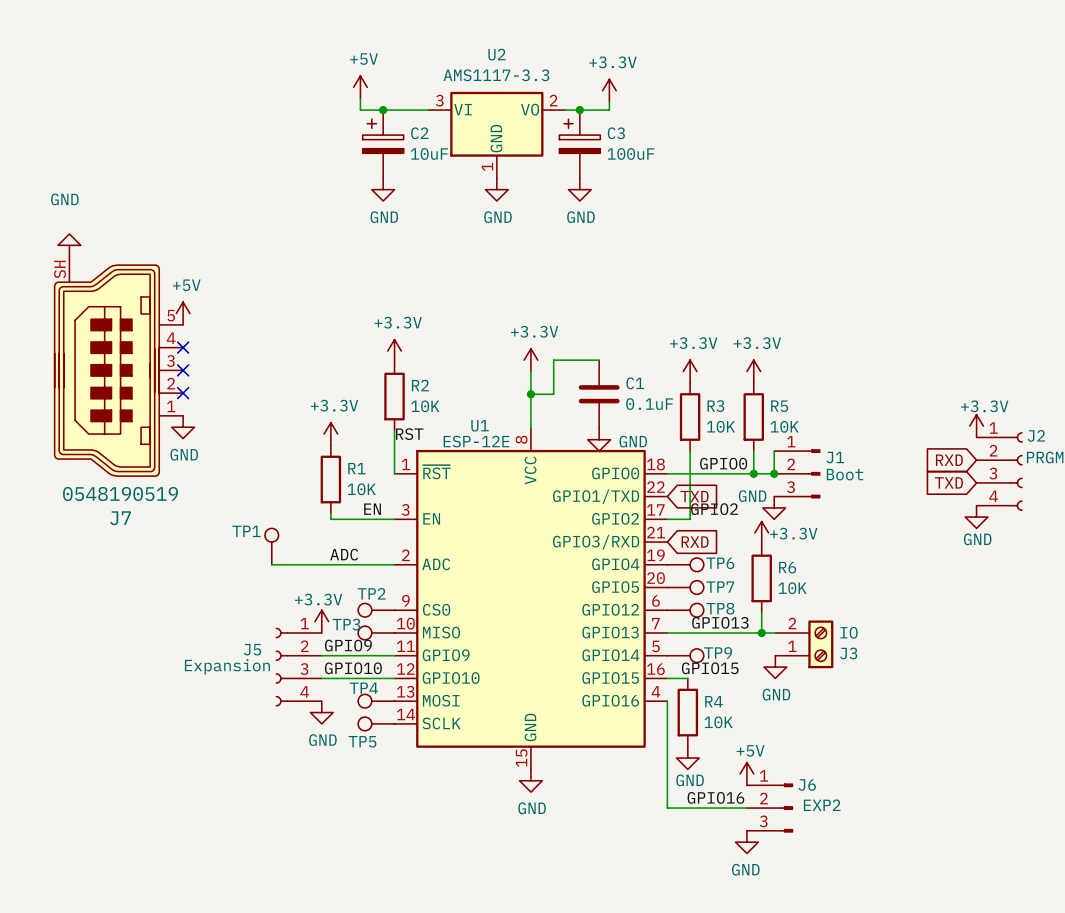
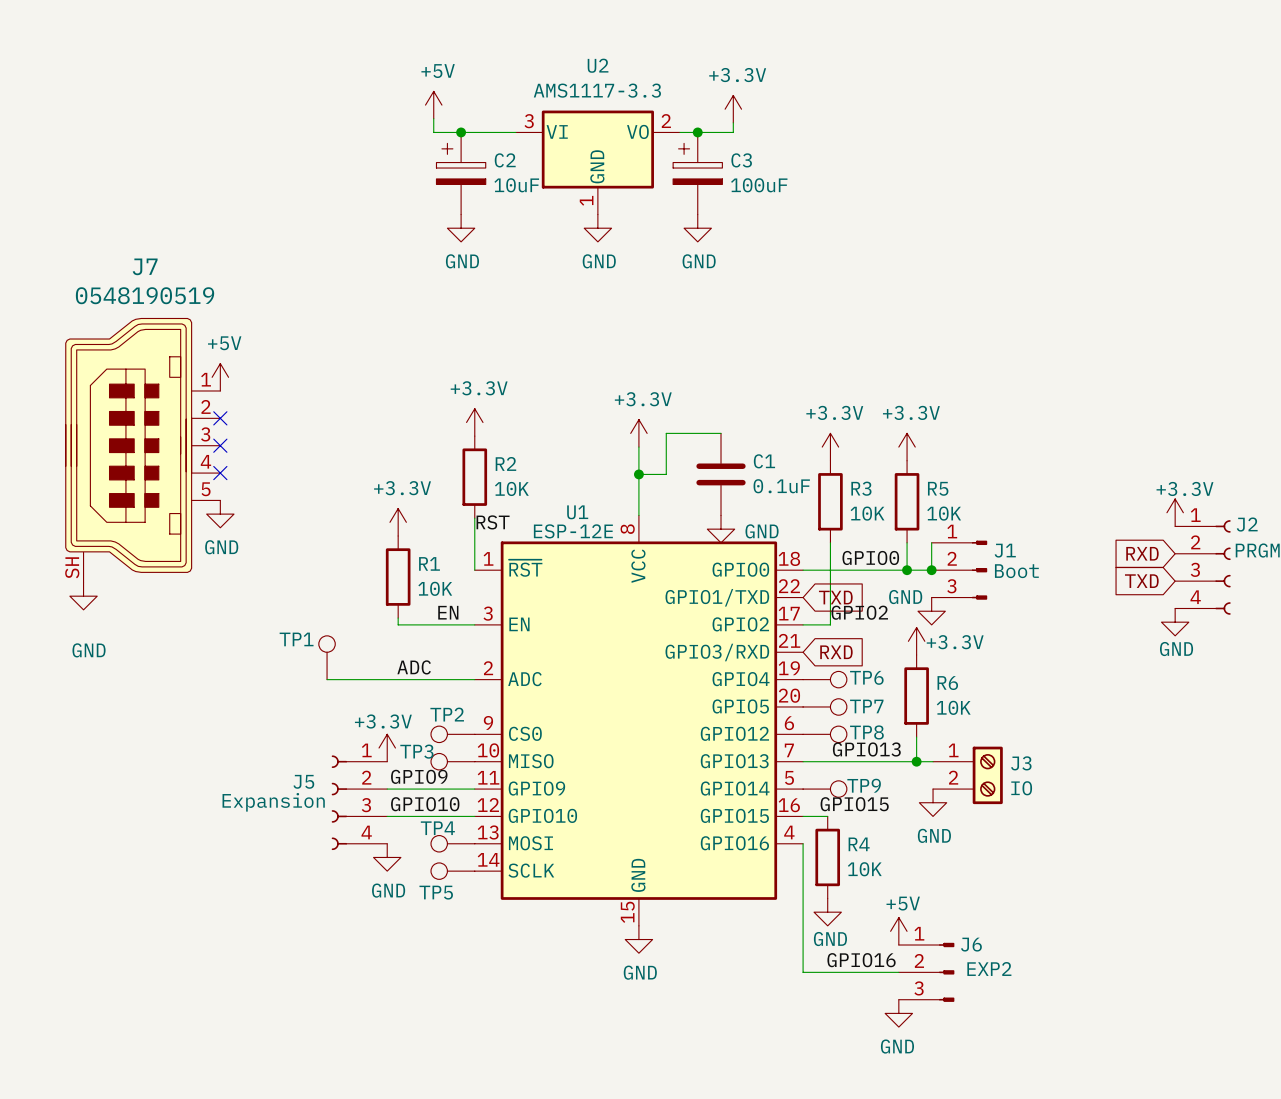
power symbol: GND (69, 245) -> none
J7 flip: as is (106, 370) -> up-down (128, 445)
power symbol: none -> GND (83, 596)
J3 flip: as is (820, 644) -> up-down (987, 775)

